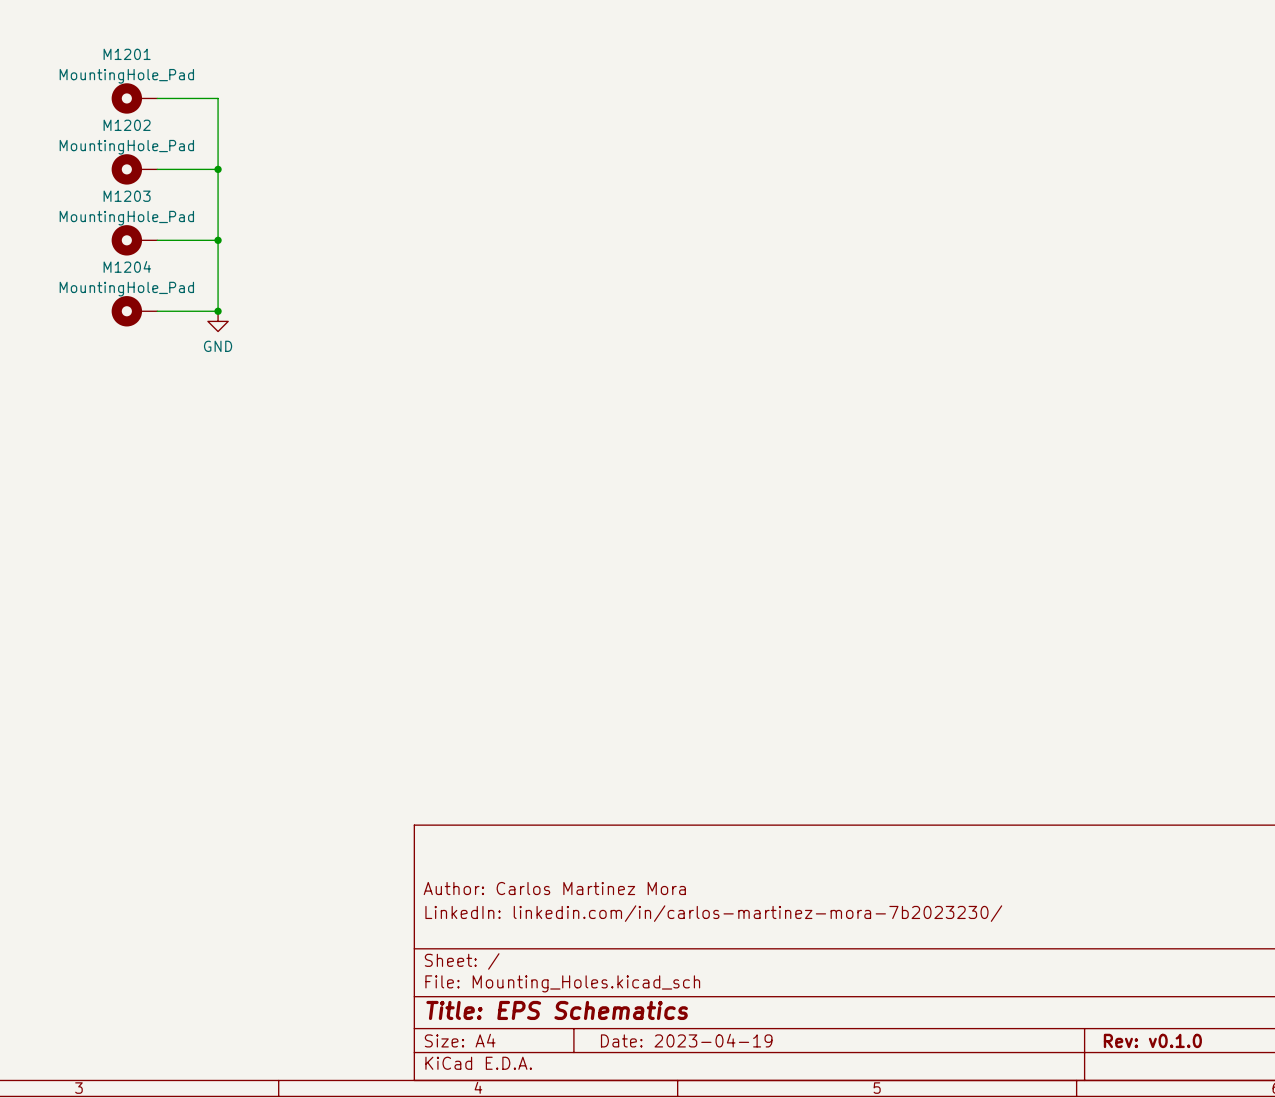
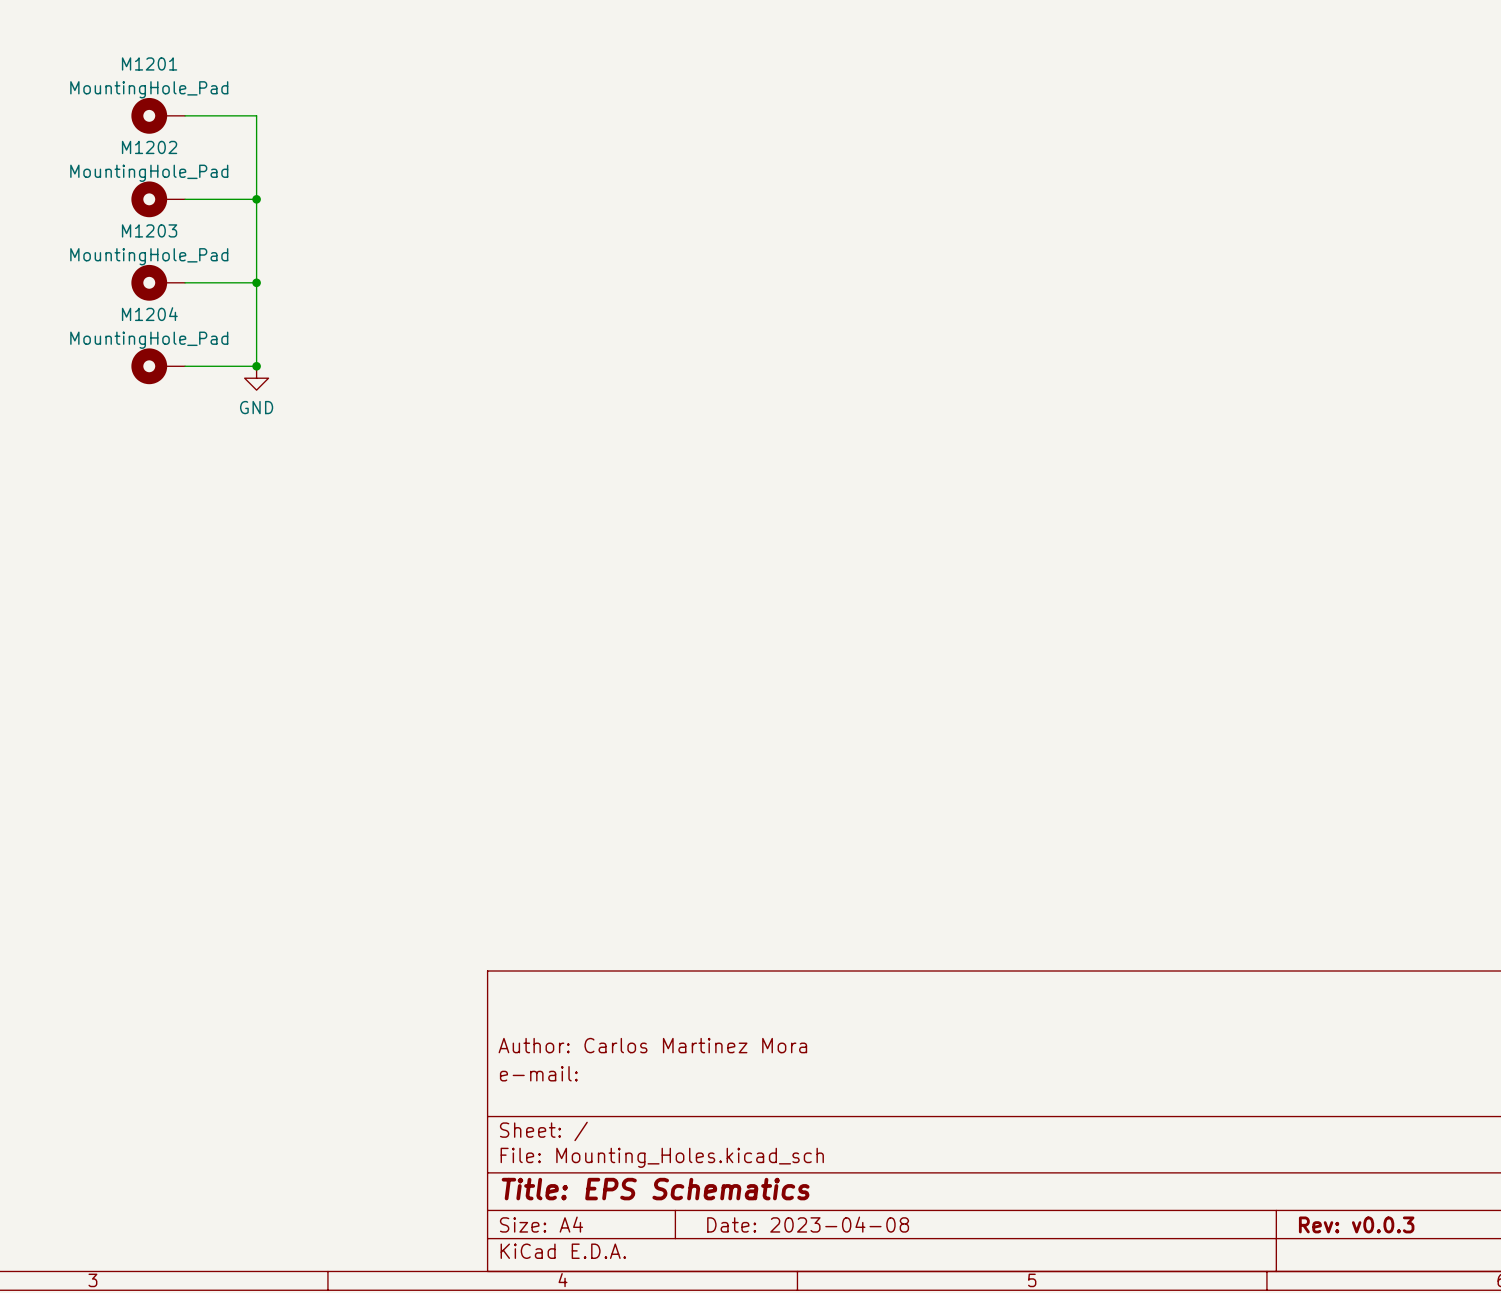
title block: LinkedIn: linkedin.com/in/carlos-martinez-mora-7b2023230/ (713, 913) -> e-mail: (538, 1073)
title block: Date: 2023-04-19 (686, 1040) -> Date: 2023-04-08 (808, 1224)
title block: Rev: v0.1.0 (1152, 1040) -> Rev: v0.0.3 (1356, 1224)

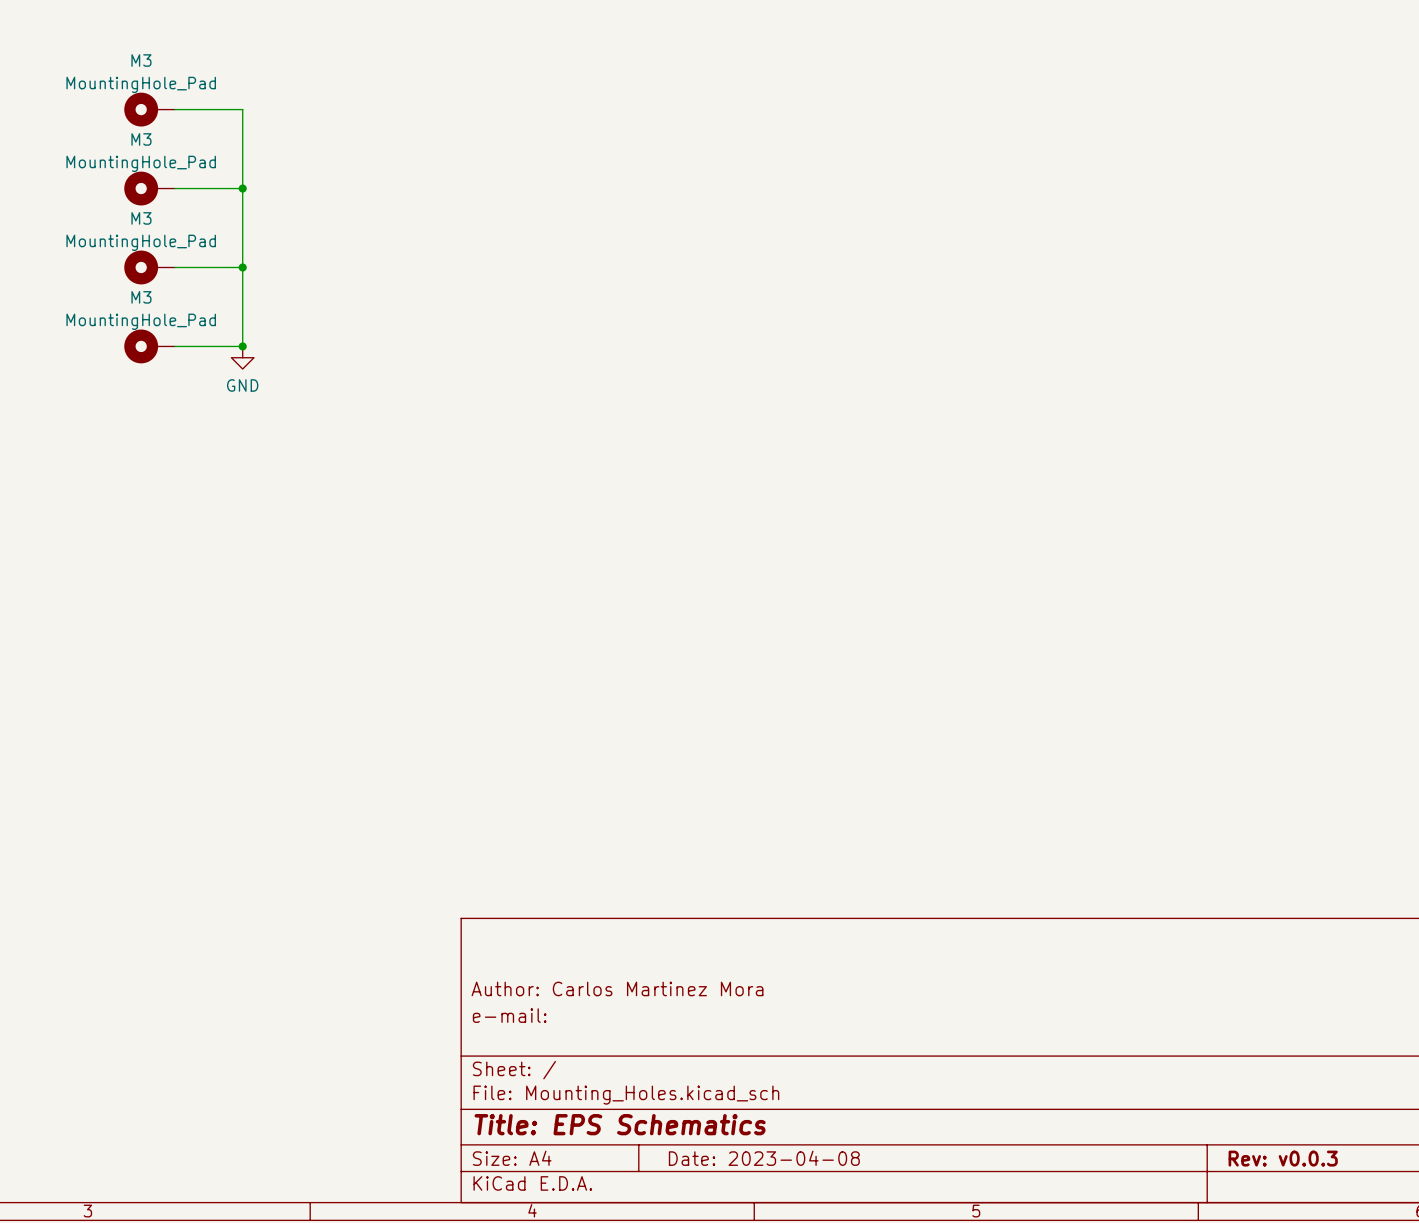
M1201 name: M1201 (149, 63) -> M3 (141, 60)
M1202 name: M1202 (149, 147) -> M3 (141, 139)
M1203 name: M1203 (149, 230) -> M3 (141, 218)
M1204 name: M1204 (149, 314) -> M3 (141, 297)

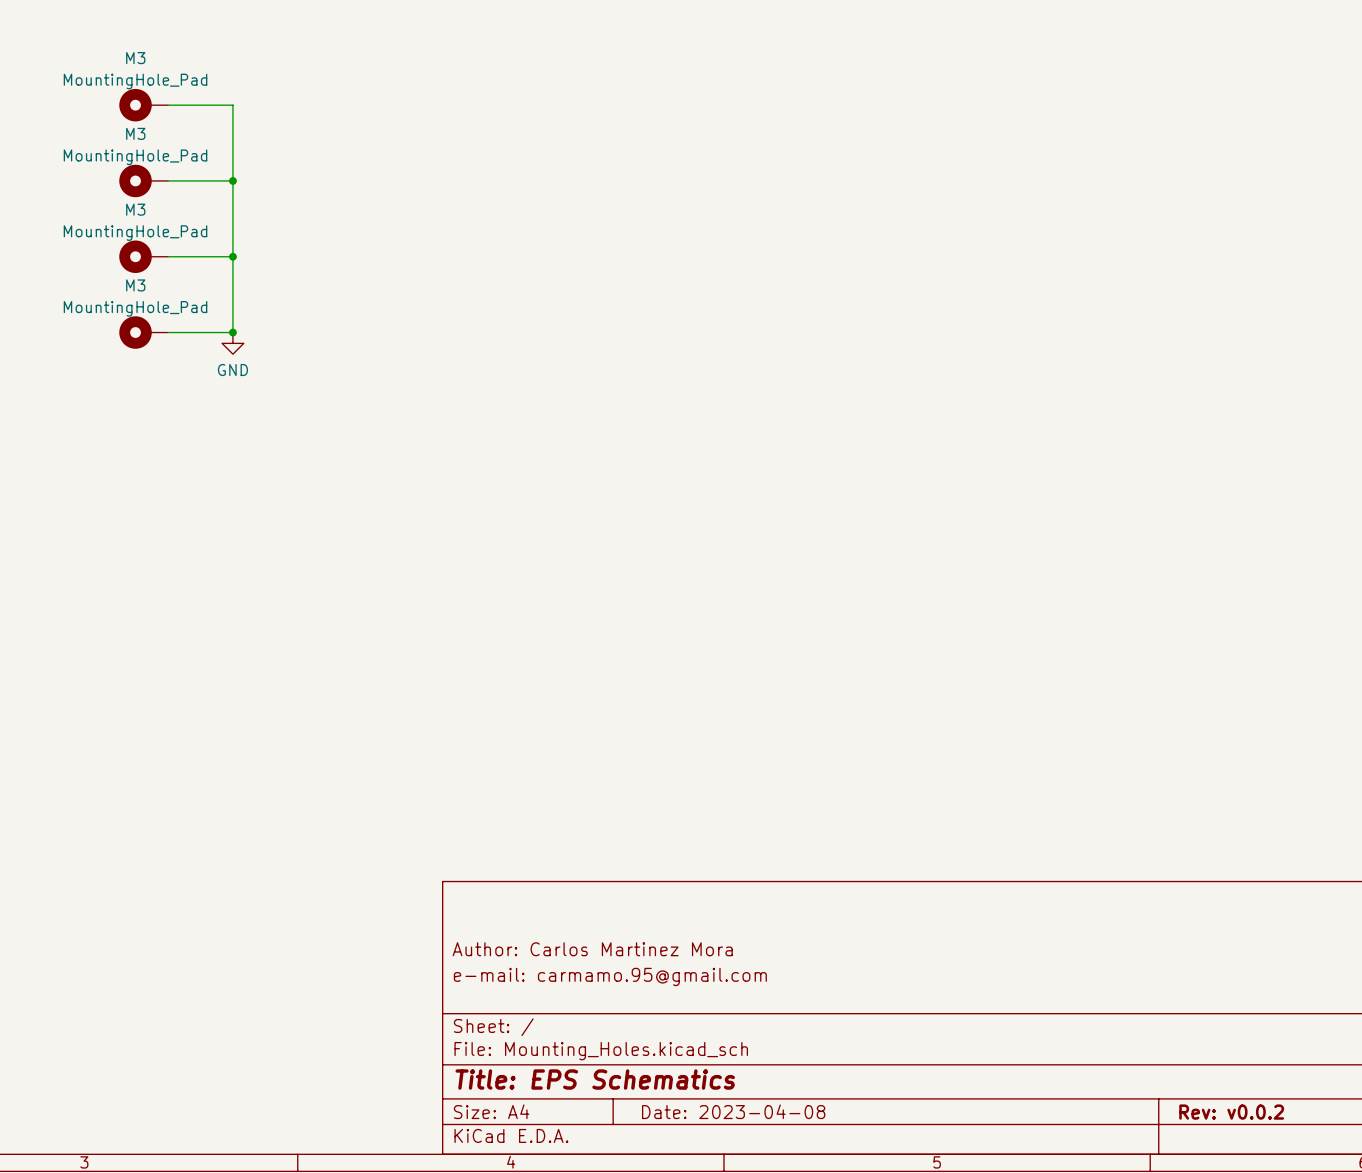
title block: e-mail: (509, 1015) -> e-mail: carmamo.95@gmail.com (610, 976)
title block: Rev: v0.0.3 (1283, 1158) -> Rev: v0.0.2 (1231, 1112)

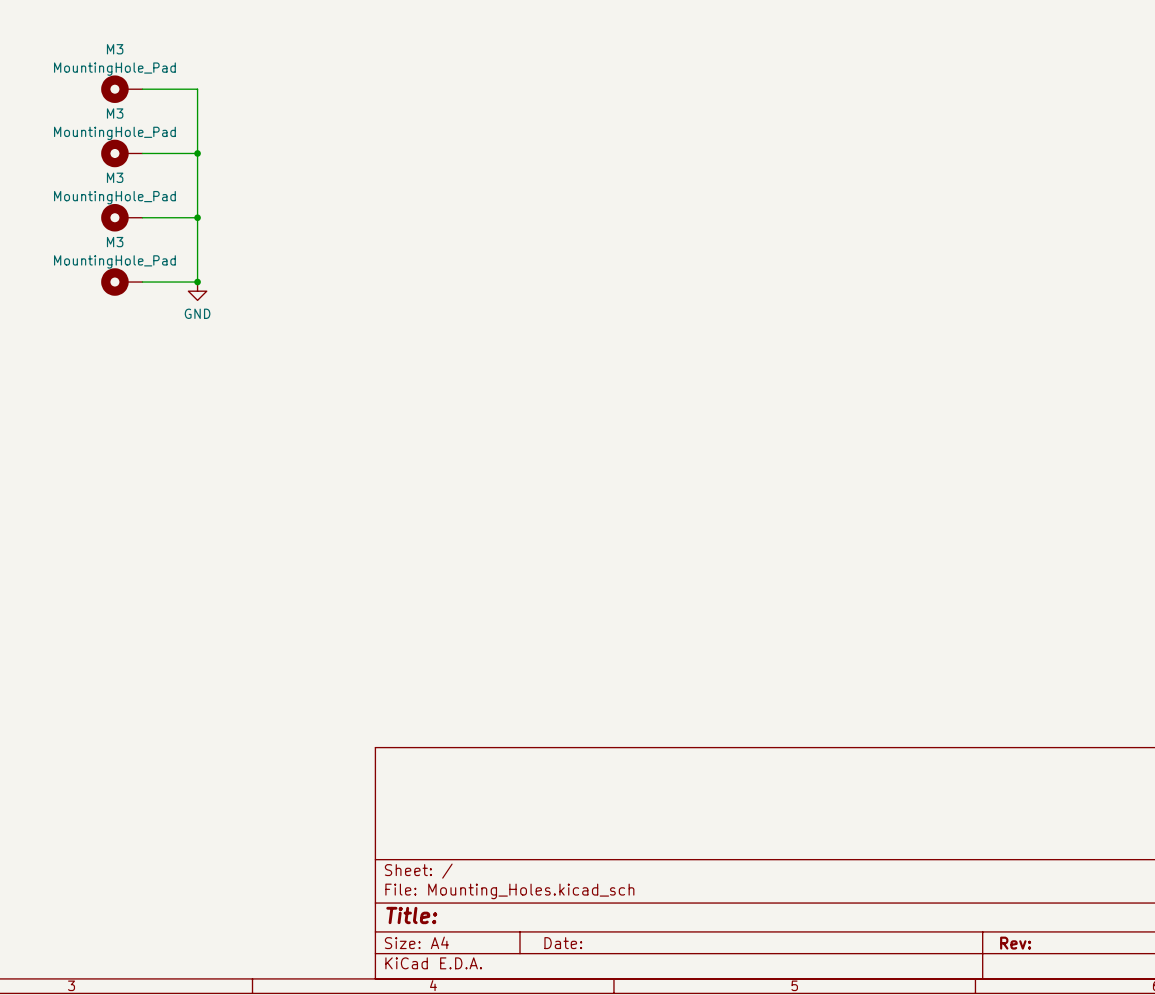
title block: Author: Carlos Martinez Mora (592, 949) -> none
title block: e-mail: carmamo.95@gmail.com (610, 976) -> none
title block: Title: EPS Schematics (595, 1079) -> Title: (411, 915)
title block: Date: 2023-04-08 (733, 1111) -> Date: (563, 943)
title block: Rev: v0.0.2 (1231, 1112) -> Rev: (1015, 943)

